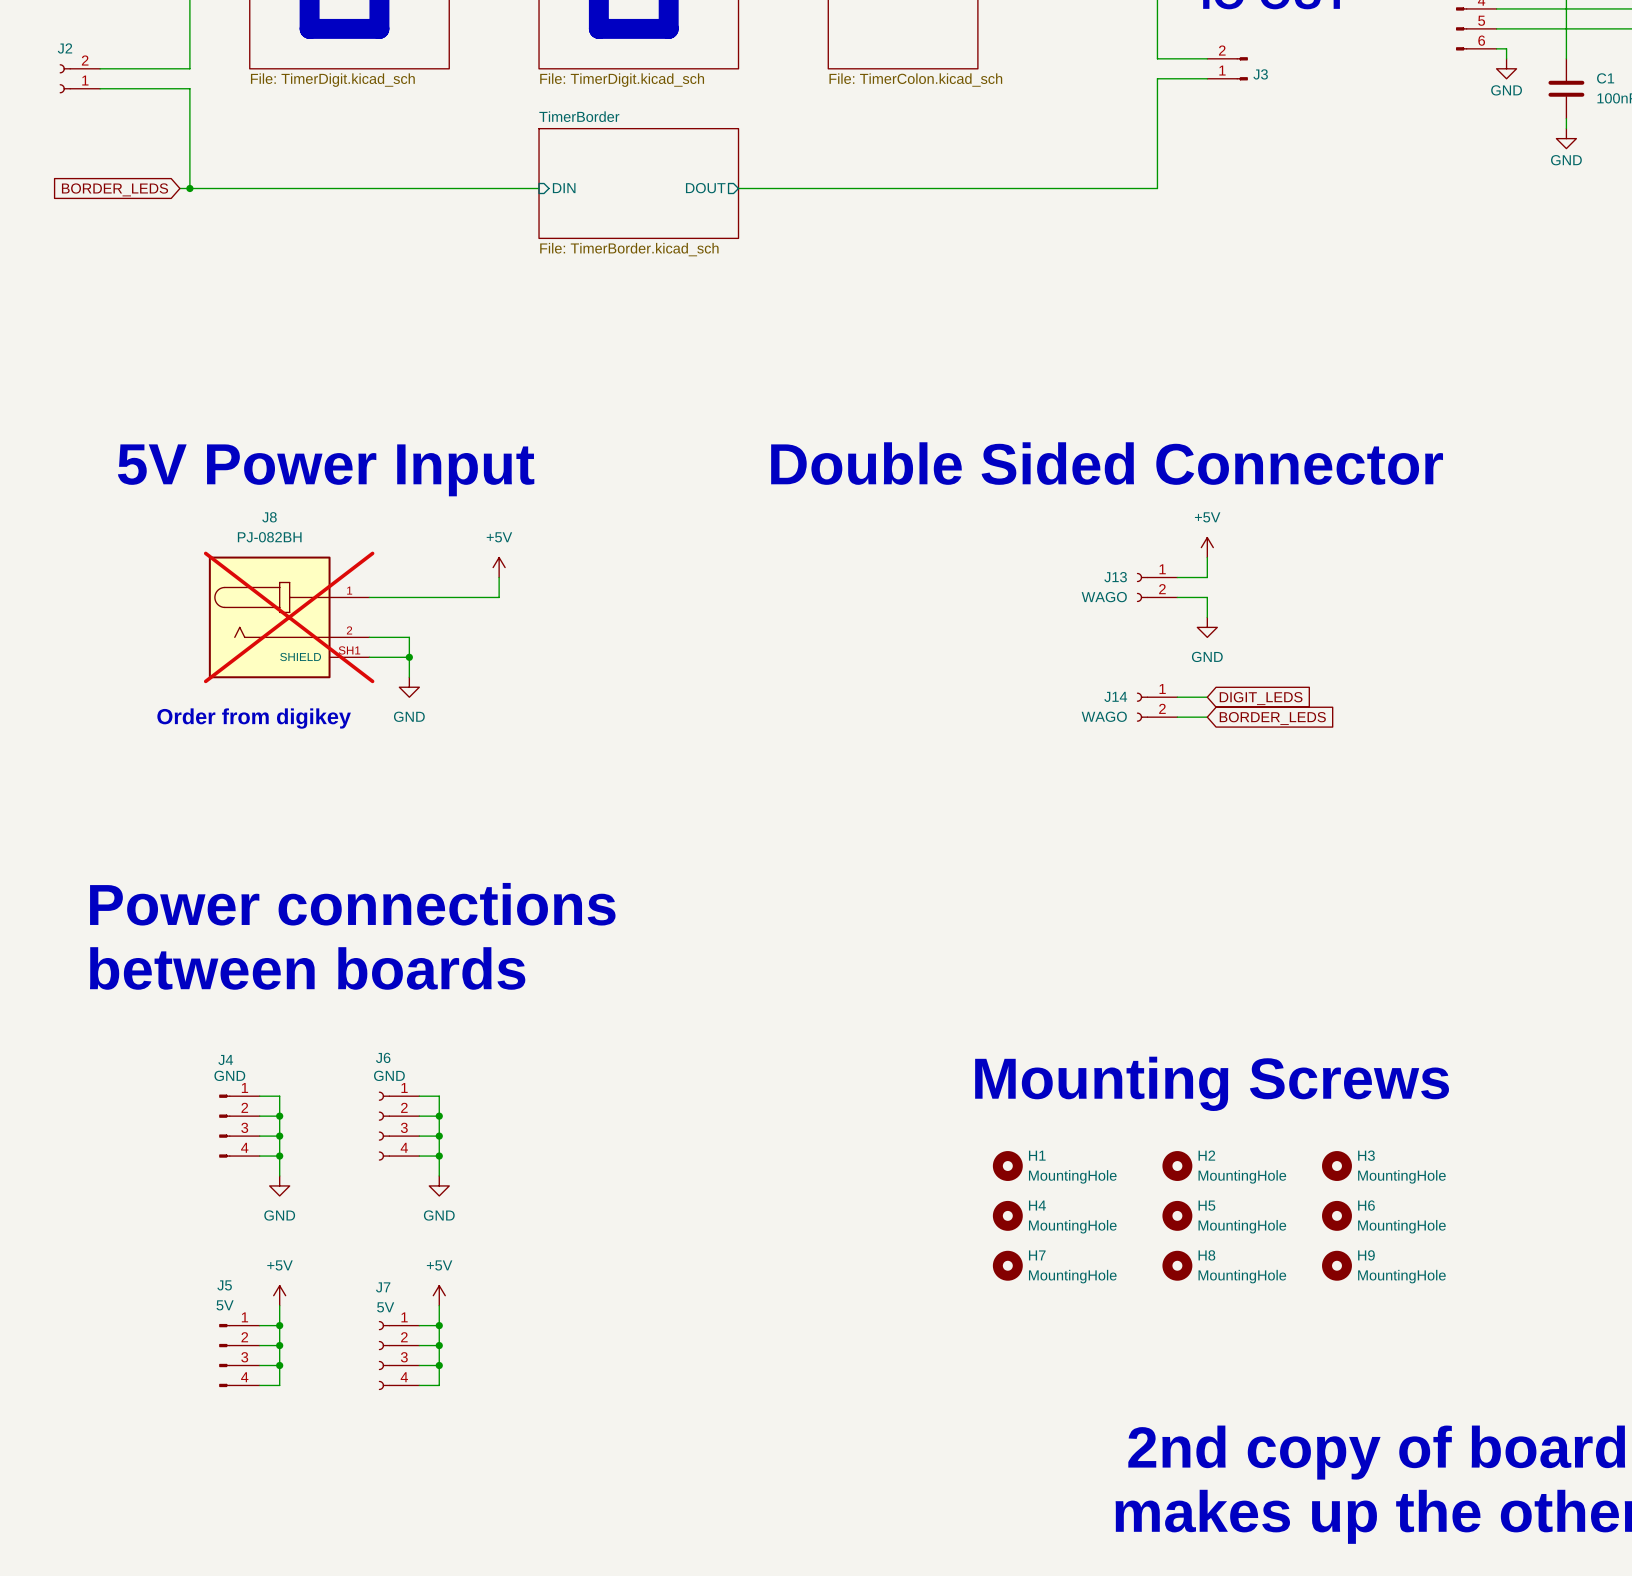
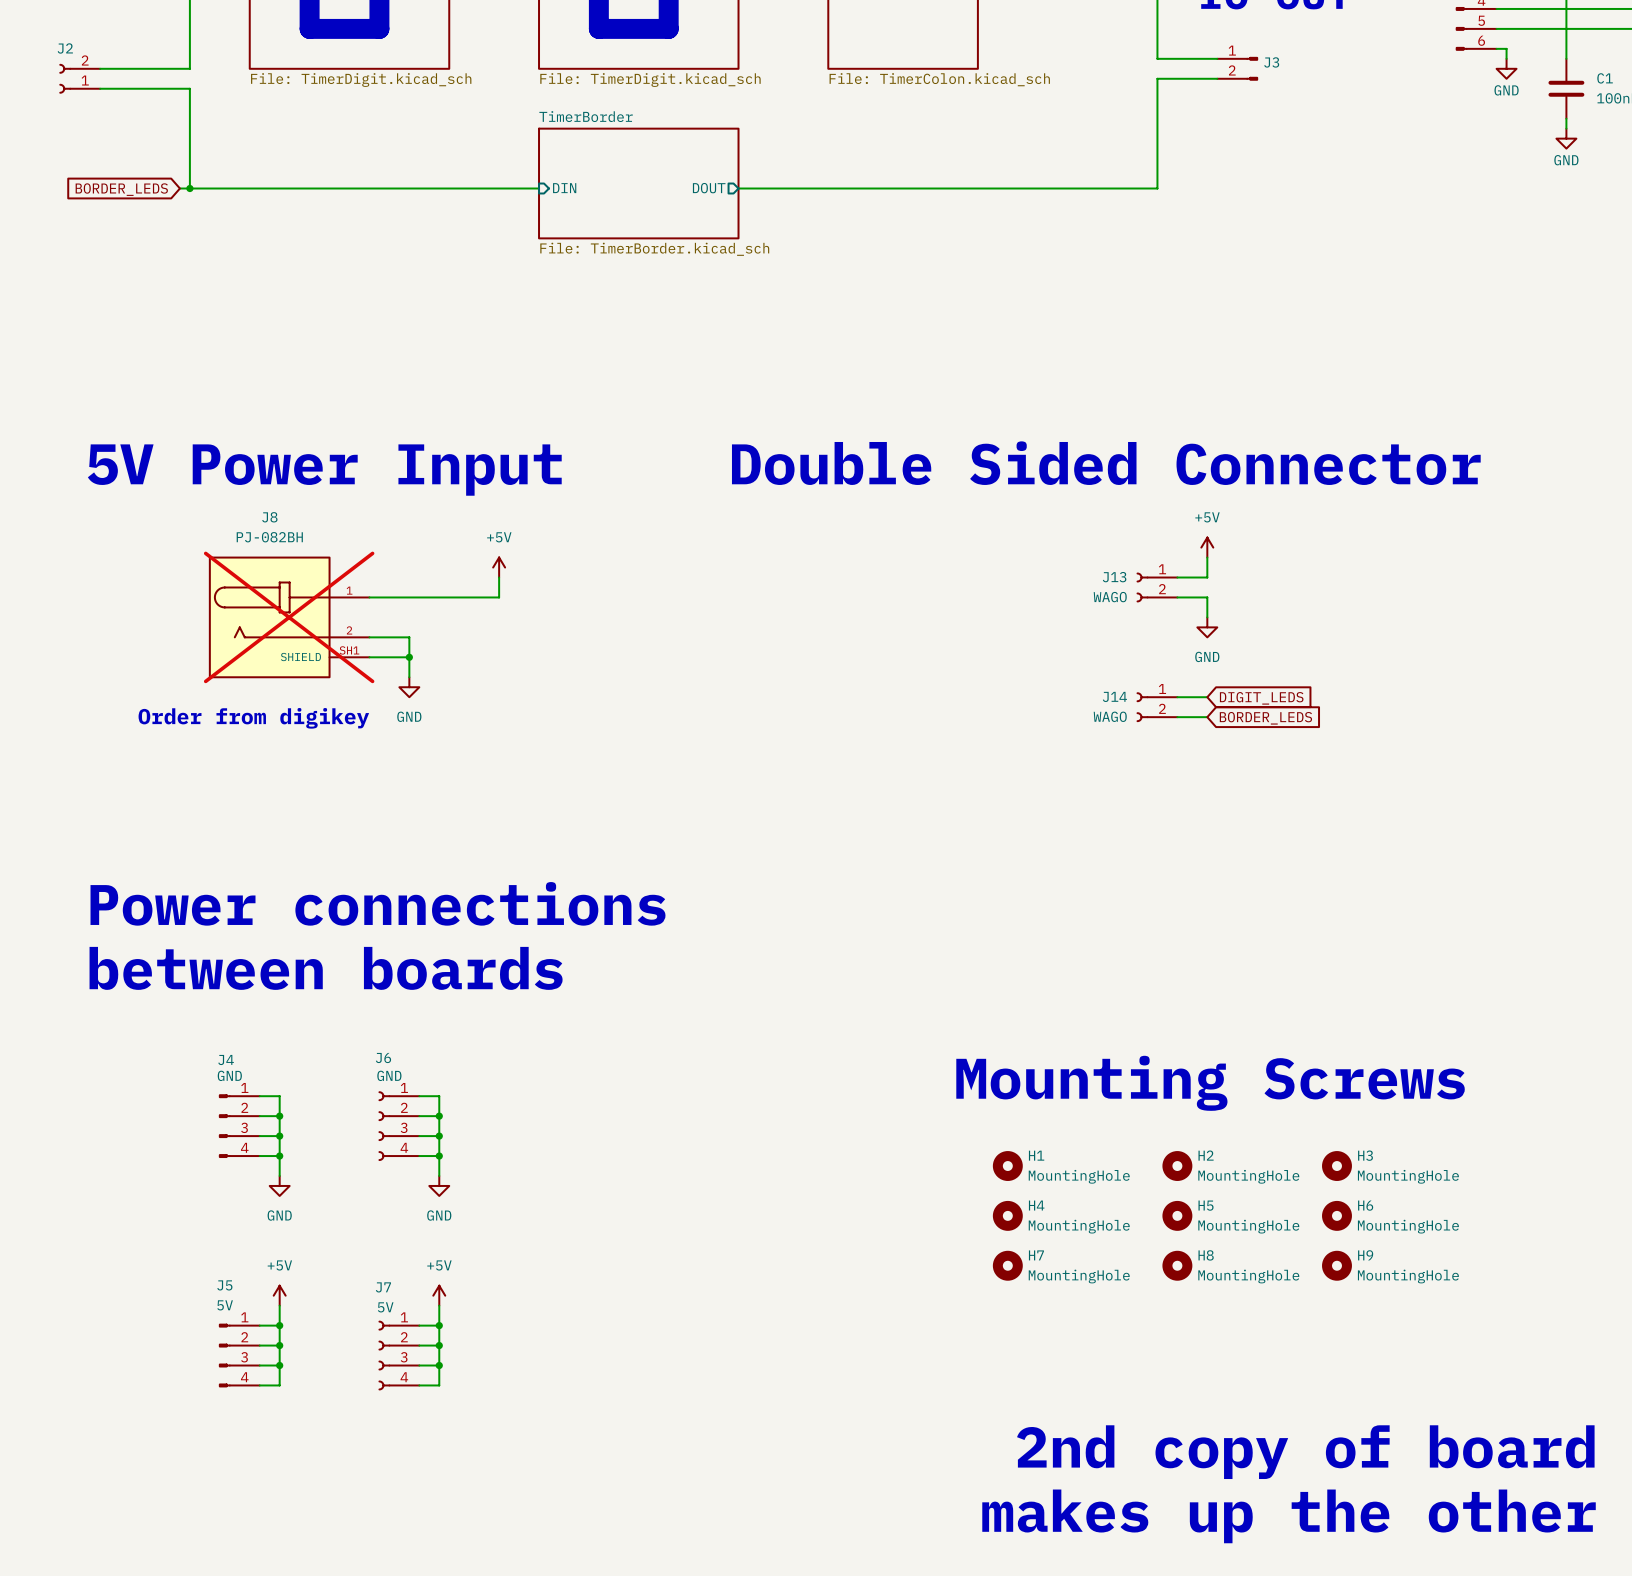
J3 flip: as is (1242, 68) -> up-down (1252, 68)

